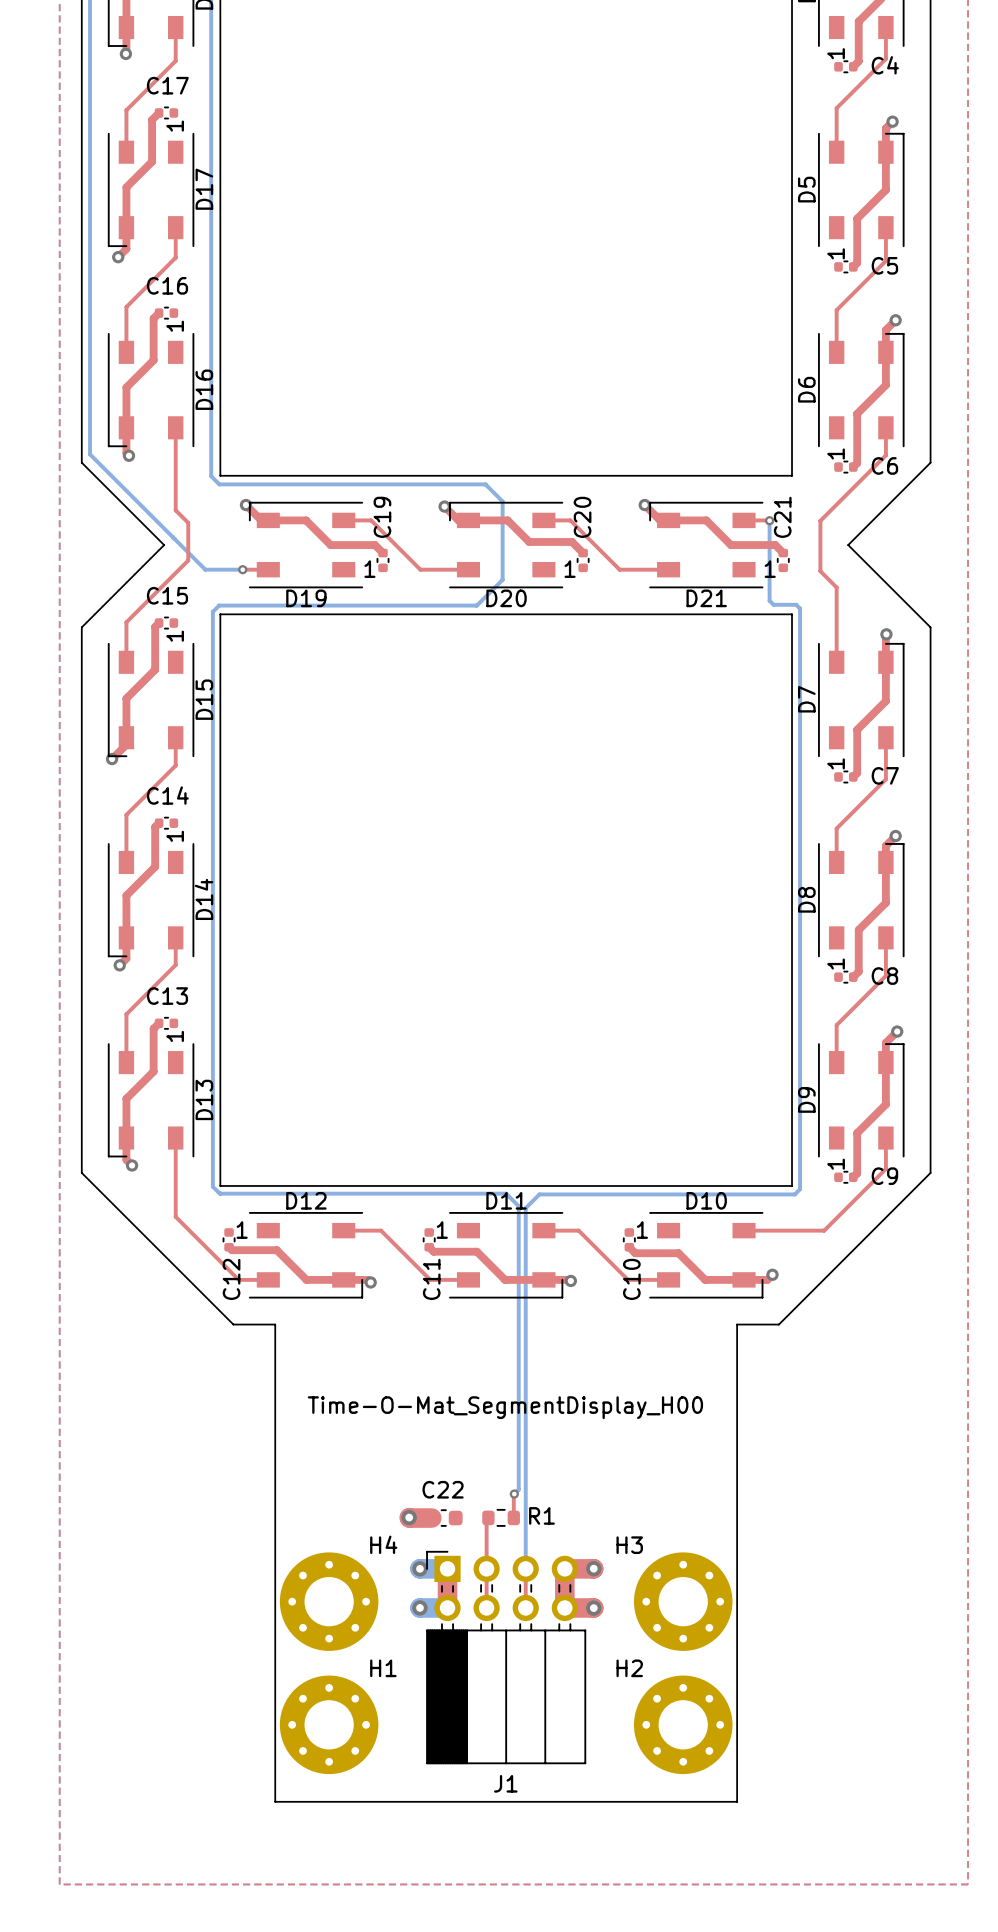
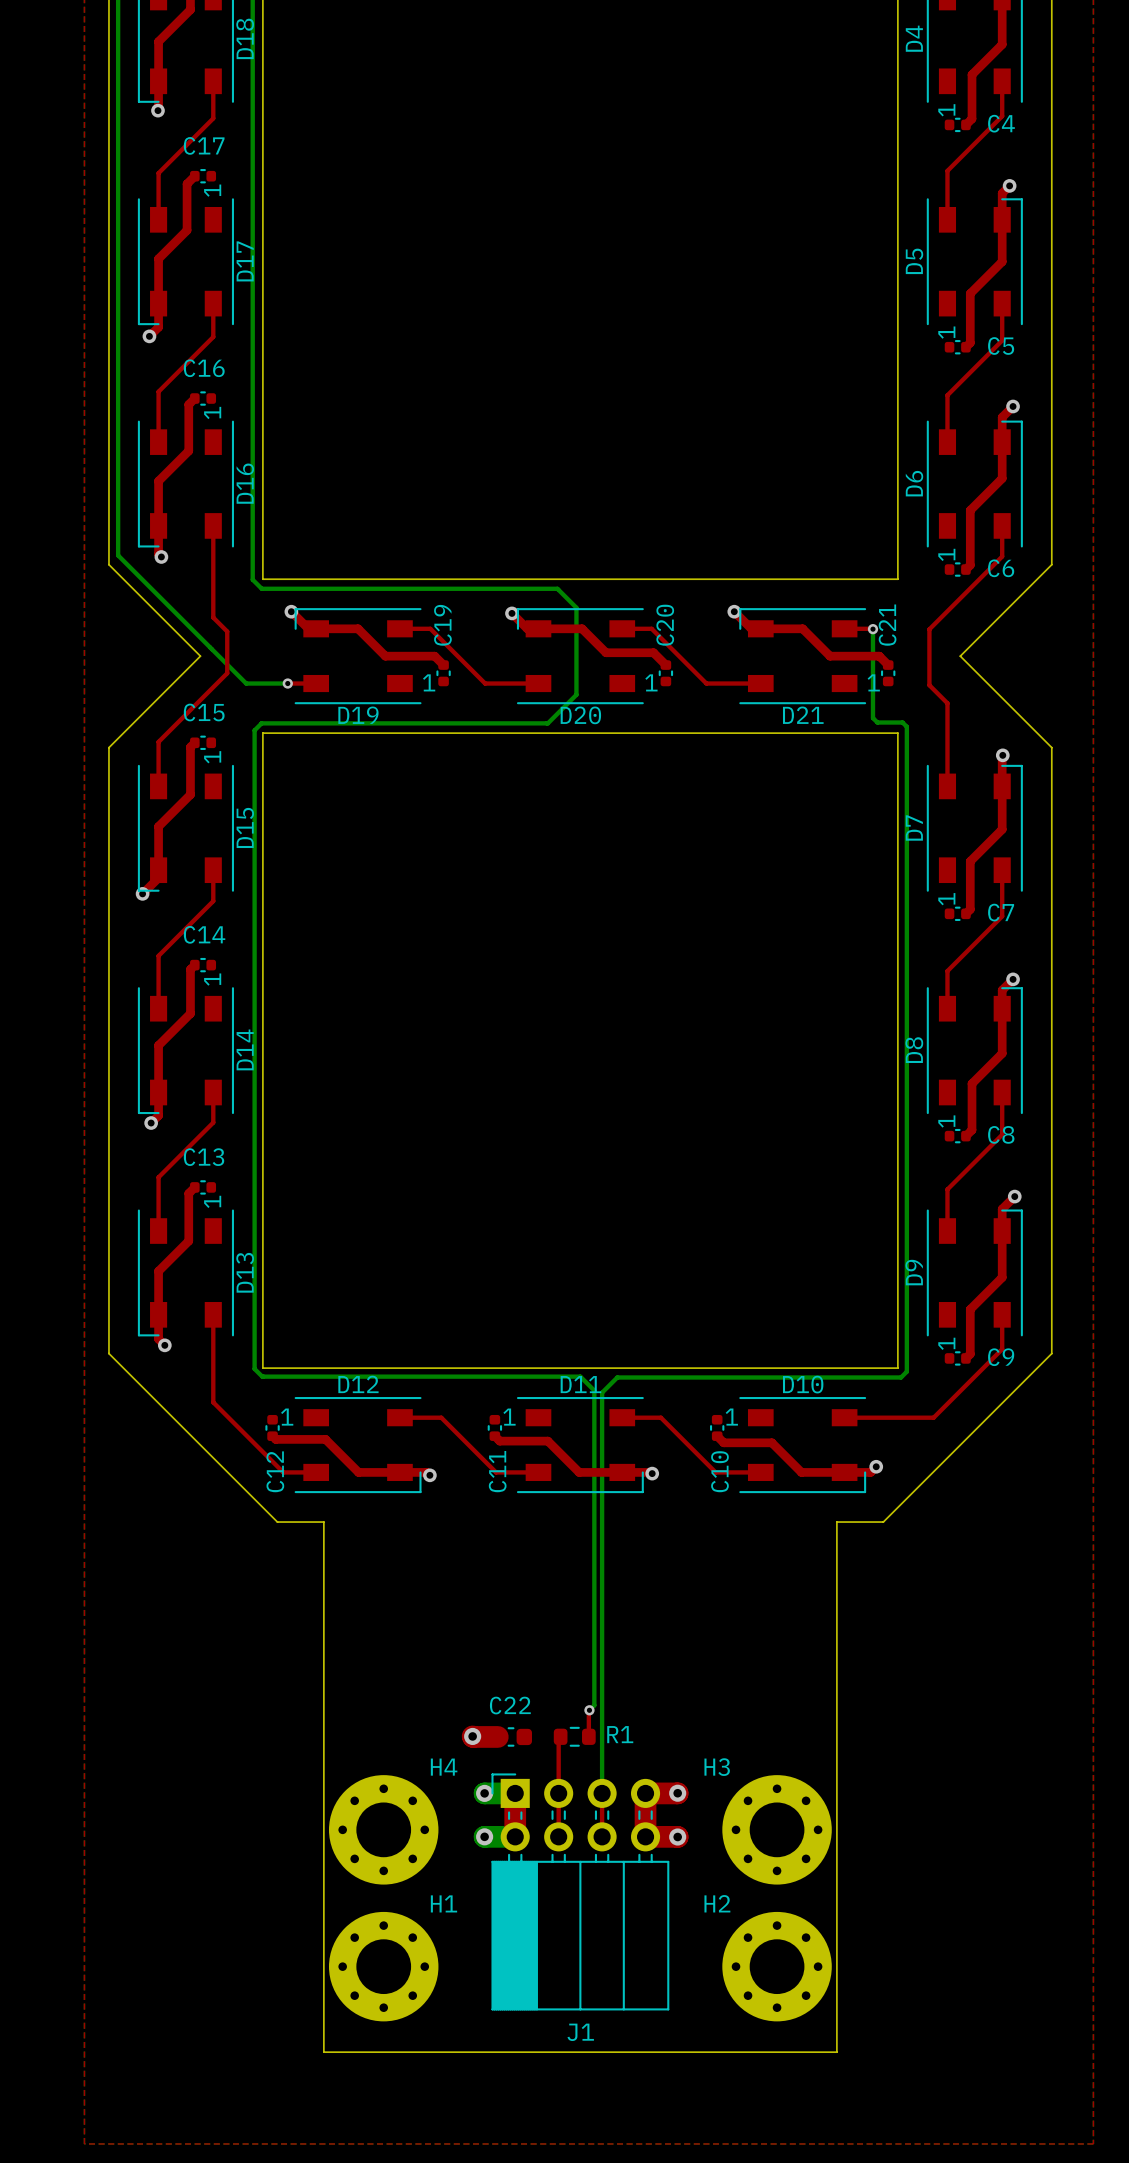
text: Time-O-Mat_SegmentDisplay_H00 (505, 1407) -> none

